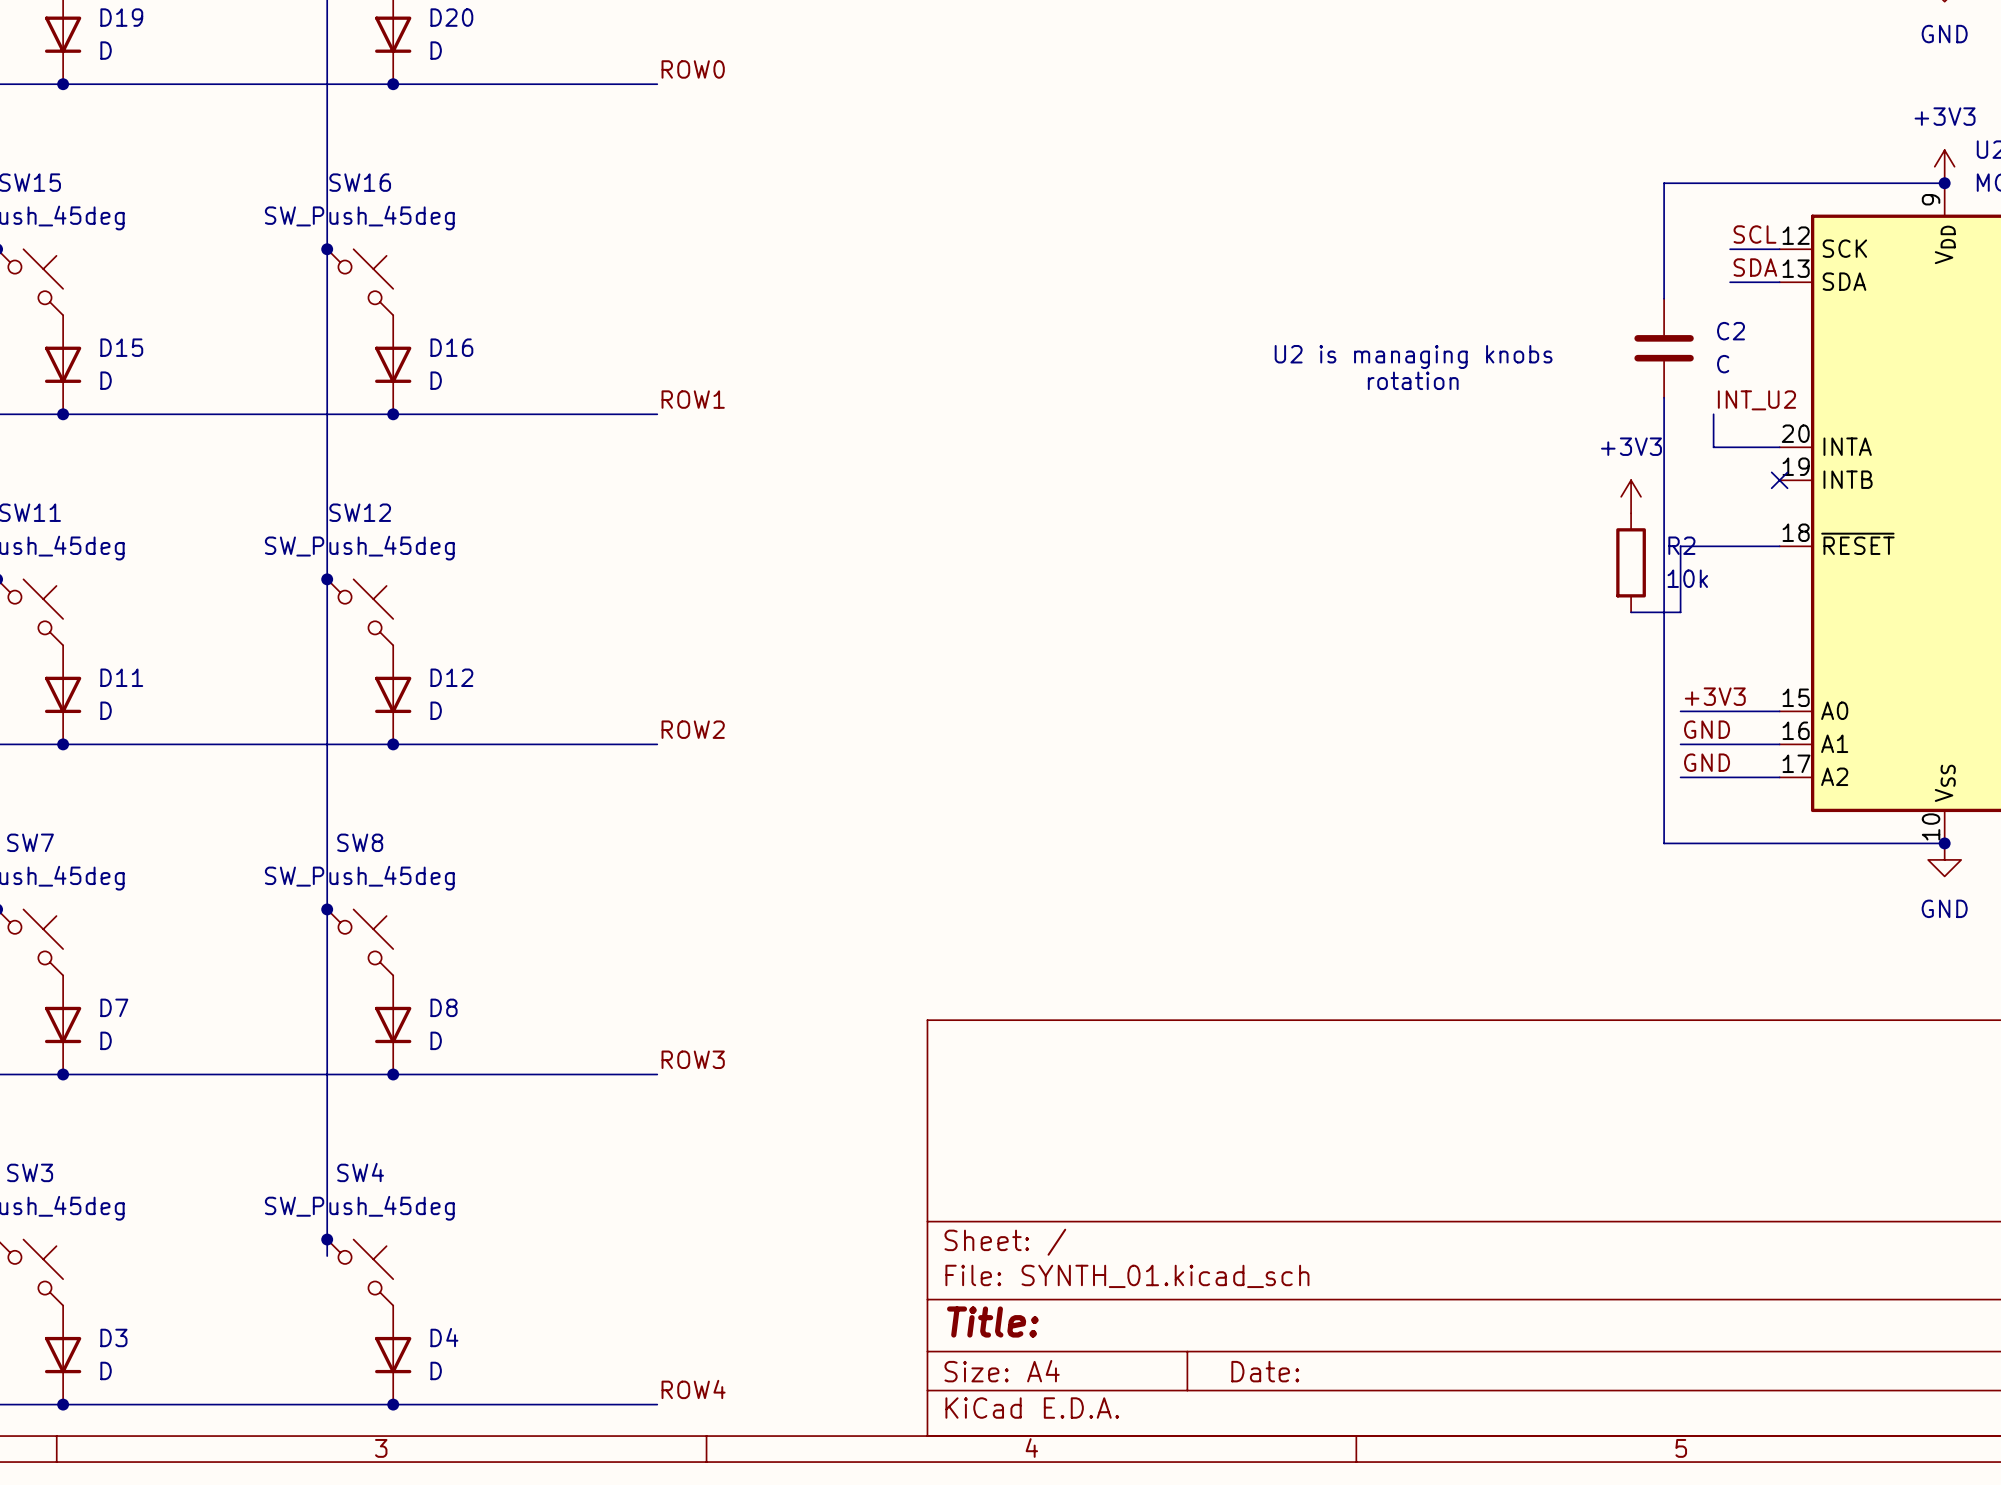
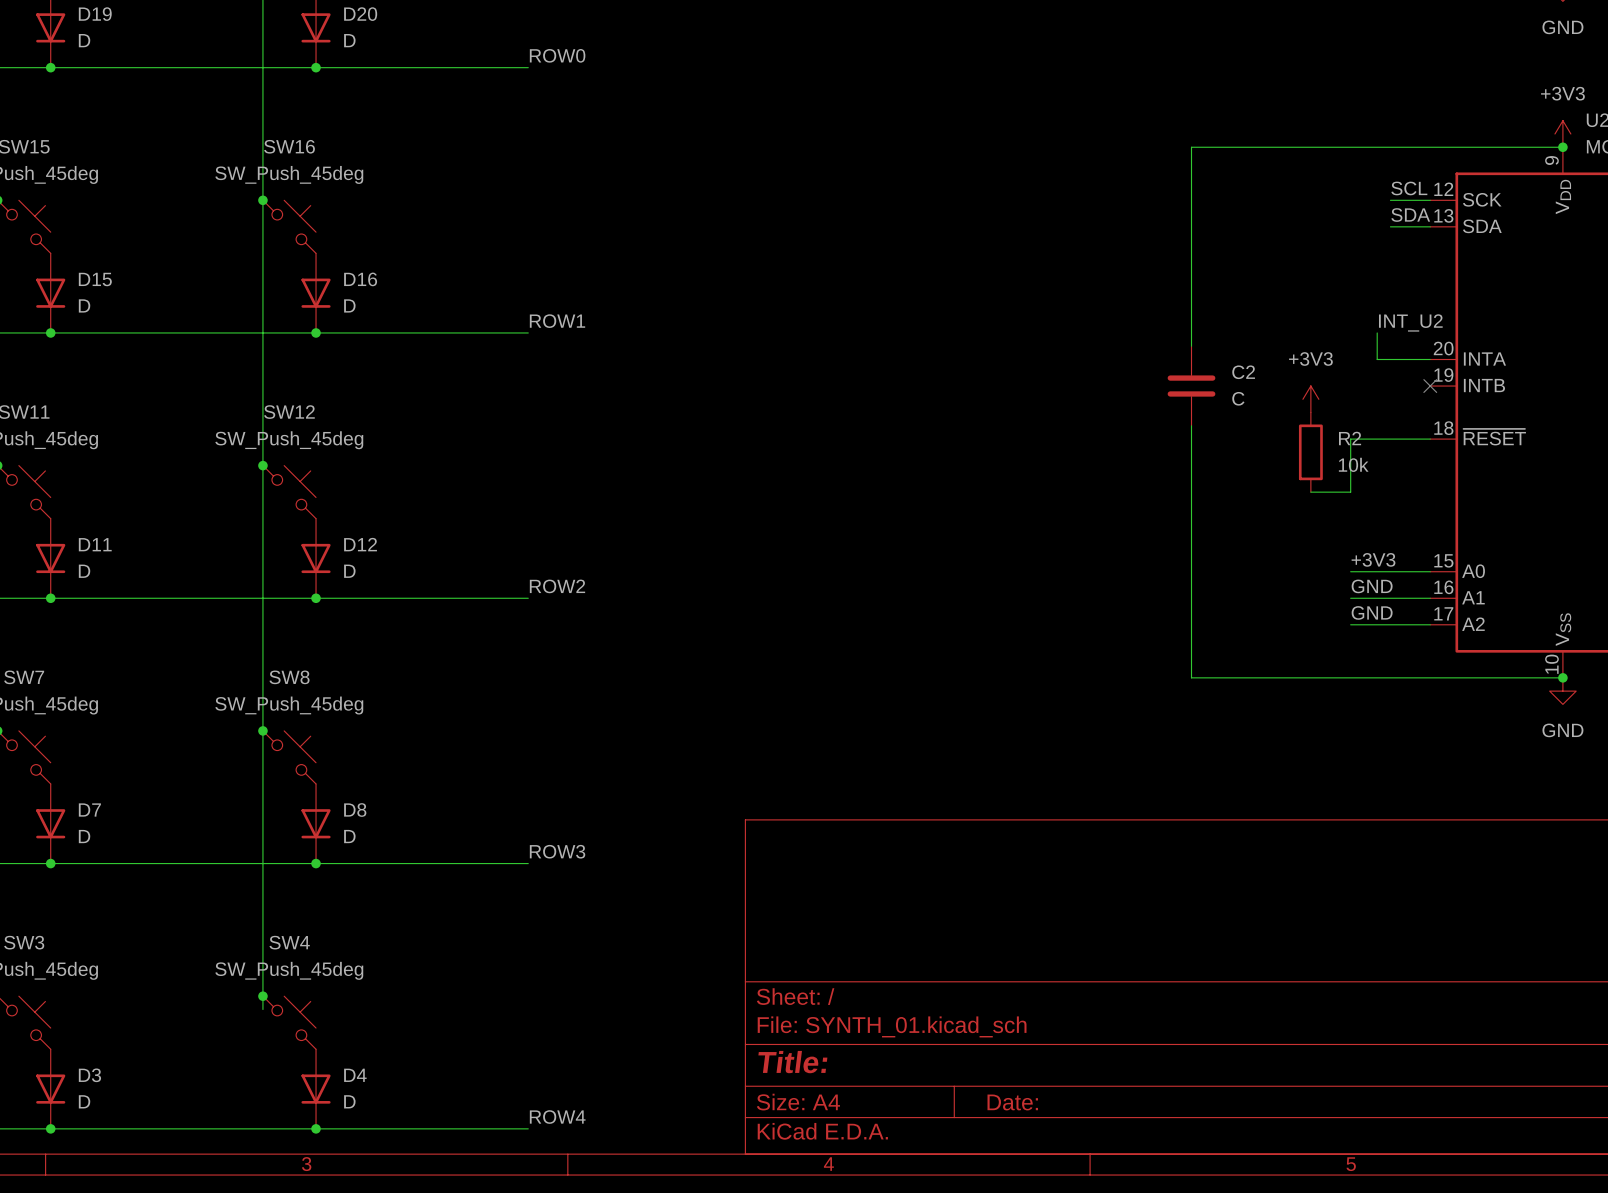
wire: (1664, 183) (1664, 298) -> (1337, 147) (1191, 147) (1191, 346)
C2 position: (1664, 348) -> (1191, 386)
text: U2 is managing knobs (1413, 356) -> none
text: rotation (1413, 380) -> none
wire: (1664, 397) (1664, 843) -> (1191, 425) (1191, 677) (1337, 677)

